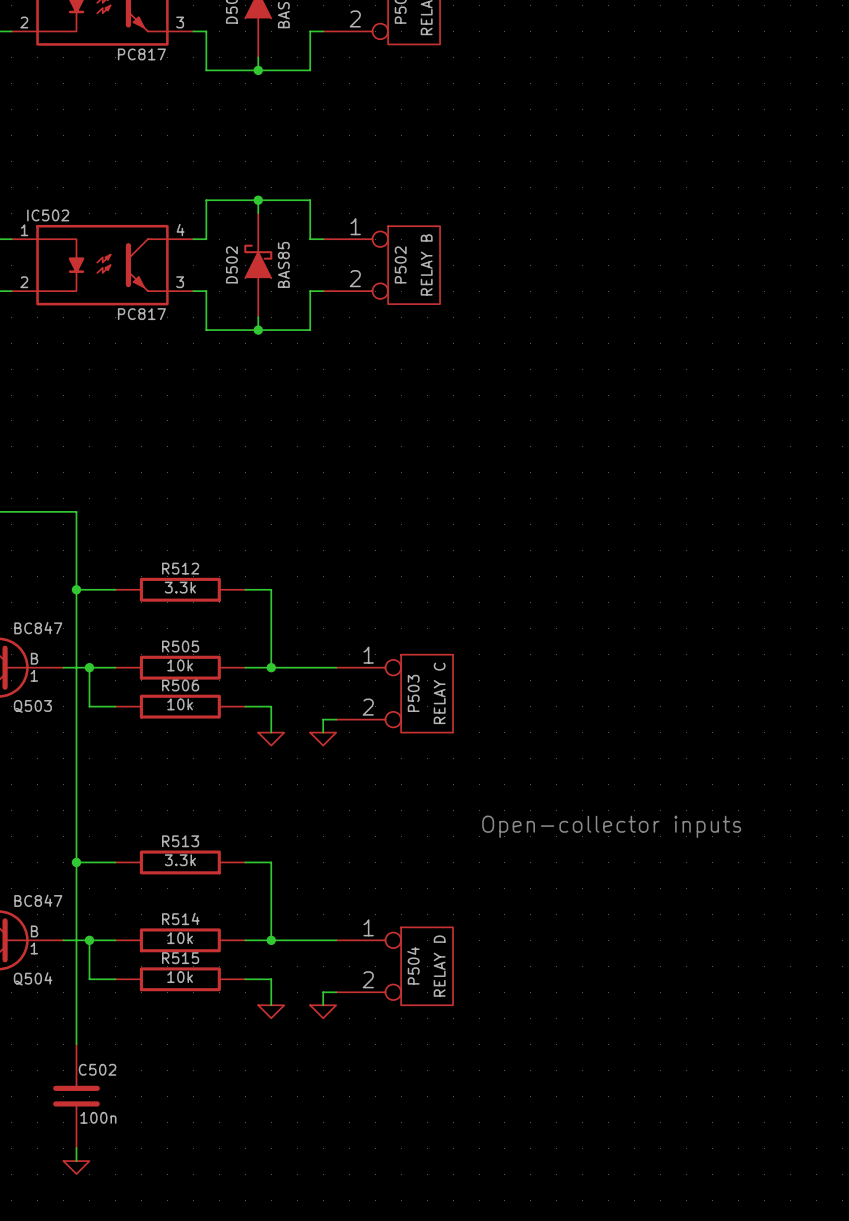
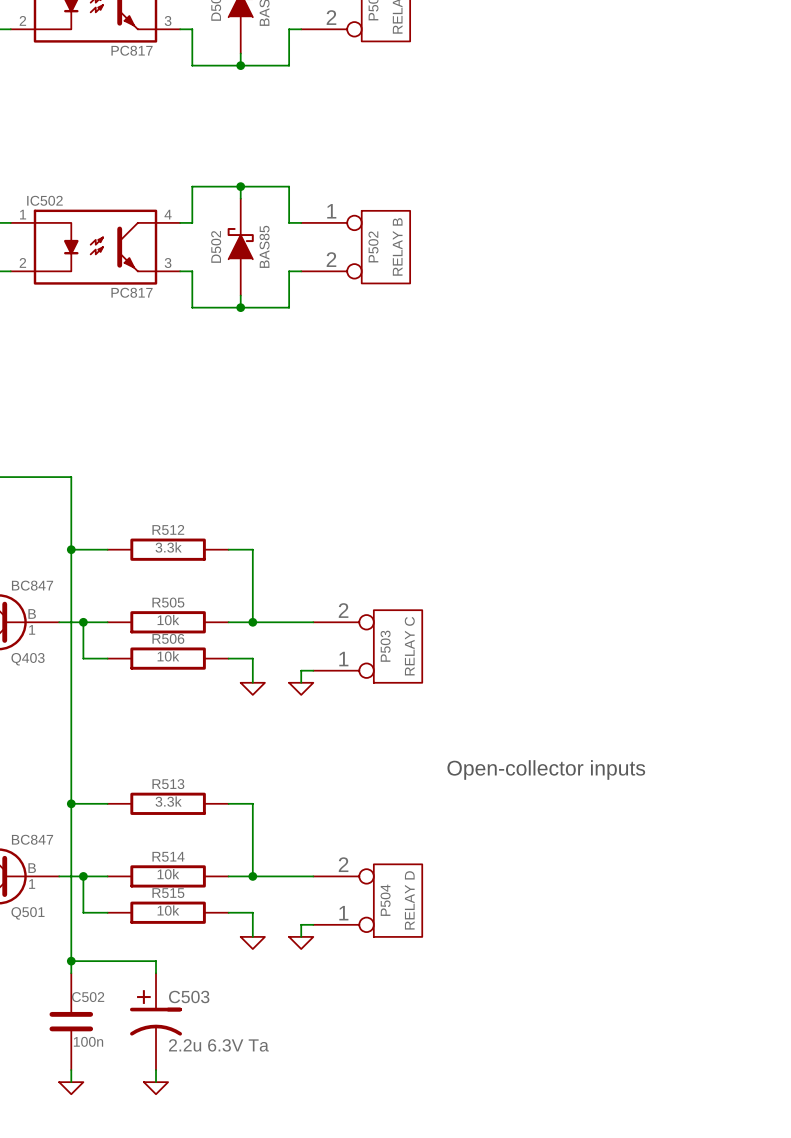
P503 flip: as is (427, 693) -> up-down (398, 646)
Q503 name: Q503 (32, 706) -> Q403 (28, 659)
P504 flip: as is (427, 966) -> up-down (398, 900)
Q504 name: Q504 (33, 978) -> Q501 (27, 913)
wire: none -> (71, 961) (156, 961) (156, 973)
junction: none -> (71, 961)
C503: none -> 2.2u 6.3V Ta (156, 1021)
wire: none -> (156, 1070) (156, 1082)
power symbol: none -> (156, 1088)

